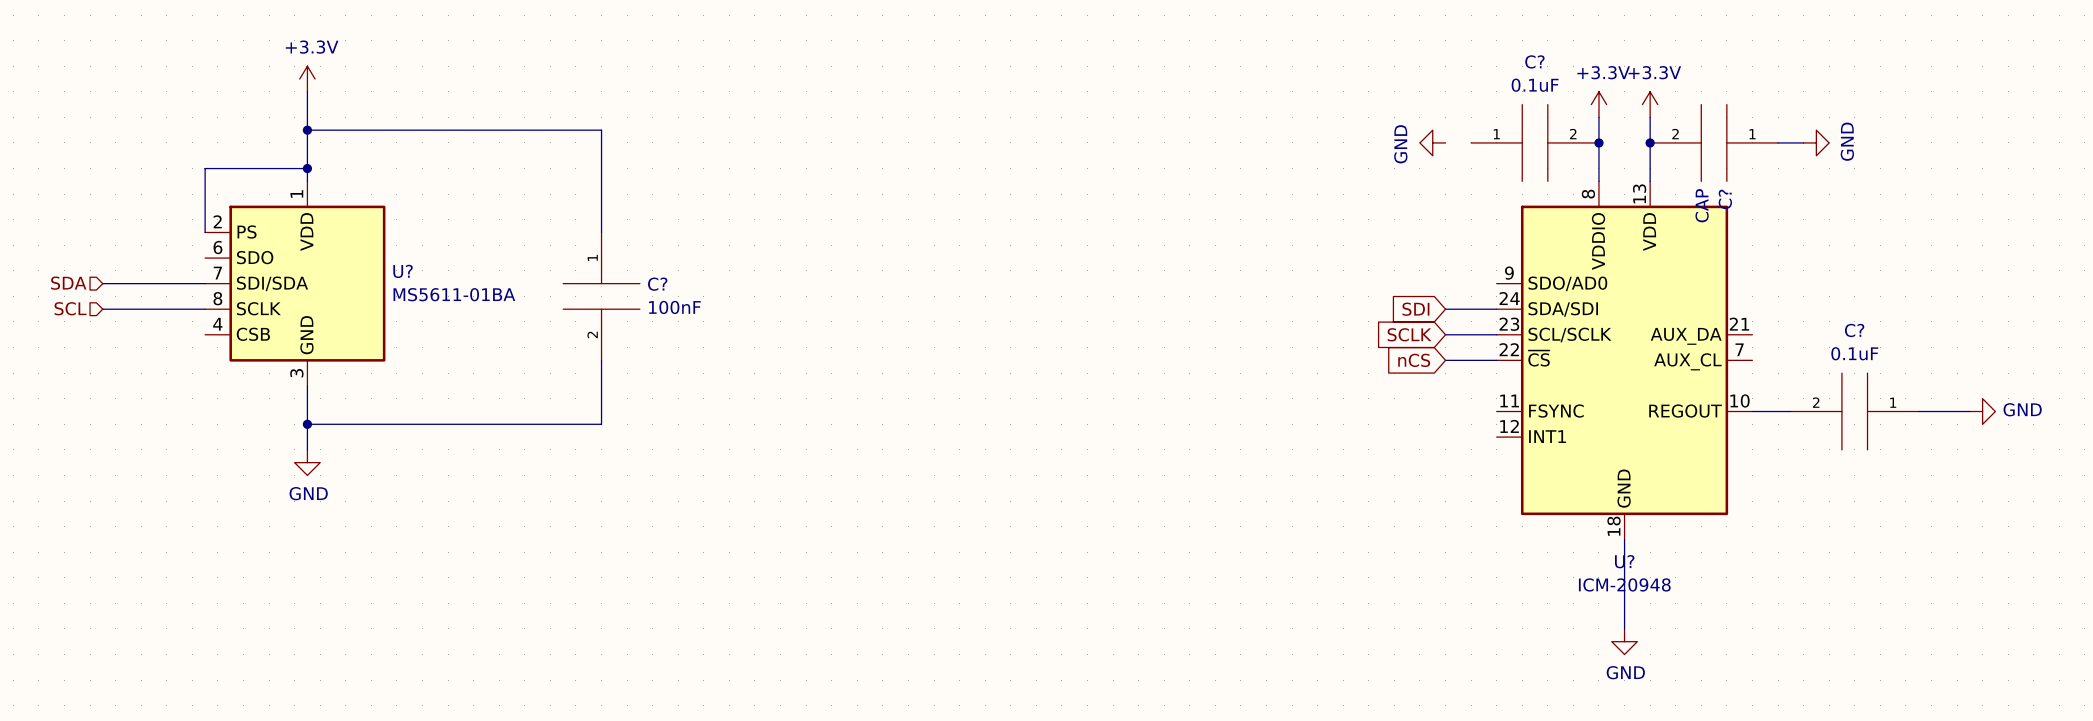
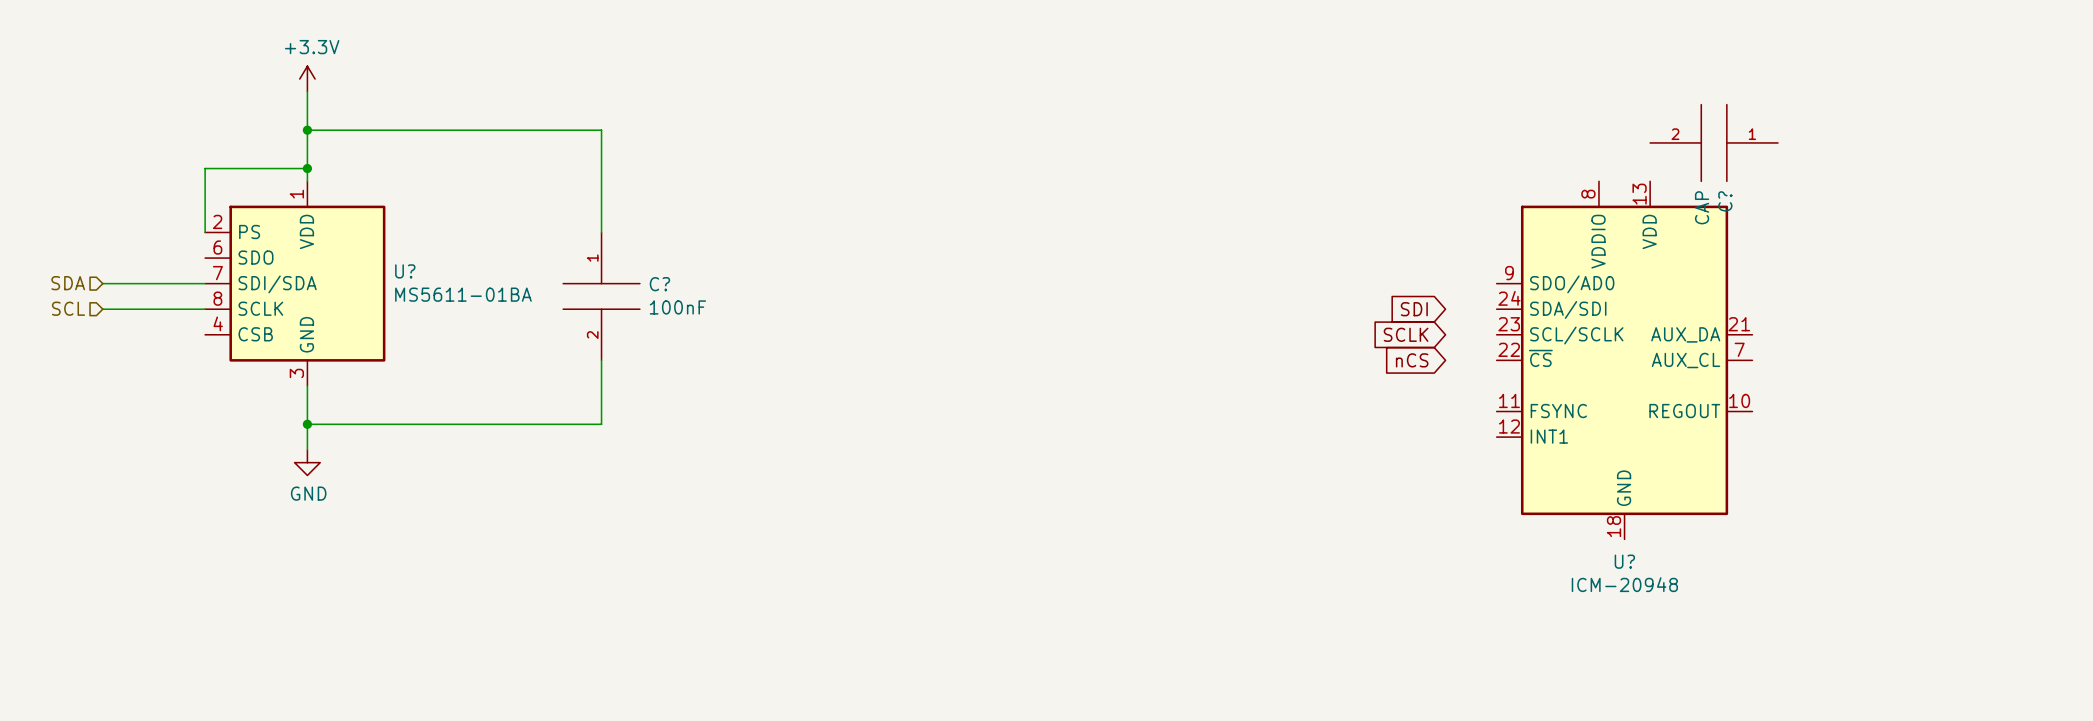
power symbol: +3.3V (1598, 104) -> none
power symbol: +3.3V (1650, 104) -> none
wire: (1598, 117) (1598, 181) -> none
wire: (1650, 117) (1650, 181) -> none
power symbol: GND (1432, 142) -> none
C?: 0.1uF (1535, 142) -> none
junction: (1598, 142) -> none
junction: (1650, 142) -> none
wire: (1778, 142) (1803, 142) -> none
power symbol: GND (1816, 142) -> none
wire: (1445, 309) (1496, 309) -> none
wire: (1445, 334) (1496, 334) -> none
wire: (1445, 360) (1496, 360) -> none
wire: (1752, 411) (1790, 411) -> none
C?: 0.1uF (1854, 411) -> none
wire: (1918, 411) (1969, 411) -> none
power symbol: GND (1982, 411) -> none
wire: (1624, 539) (1624, 628) -> none
power symbol: GND (1624, 641) -> none

